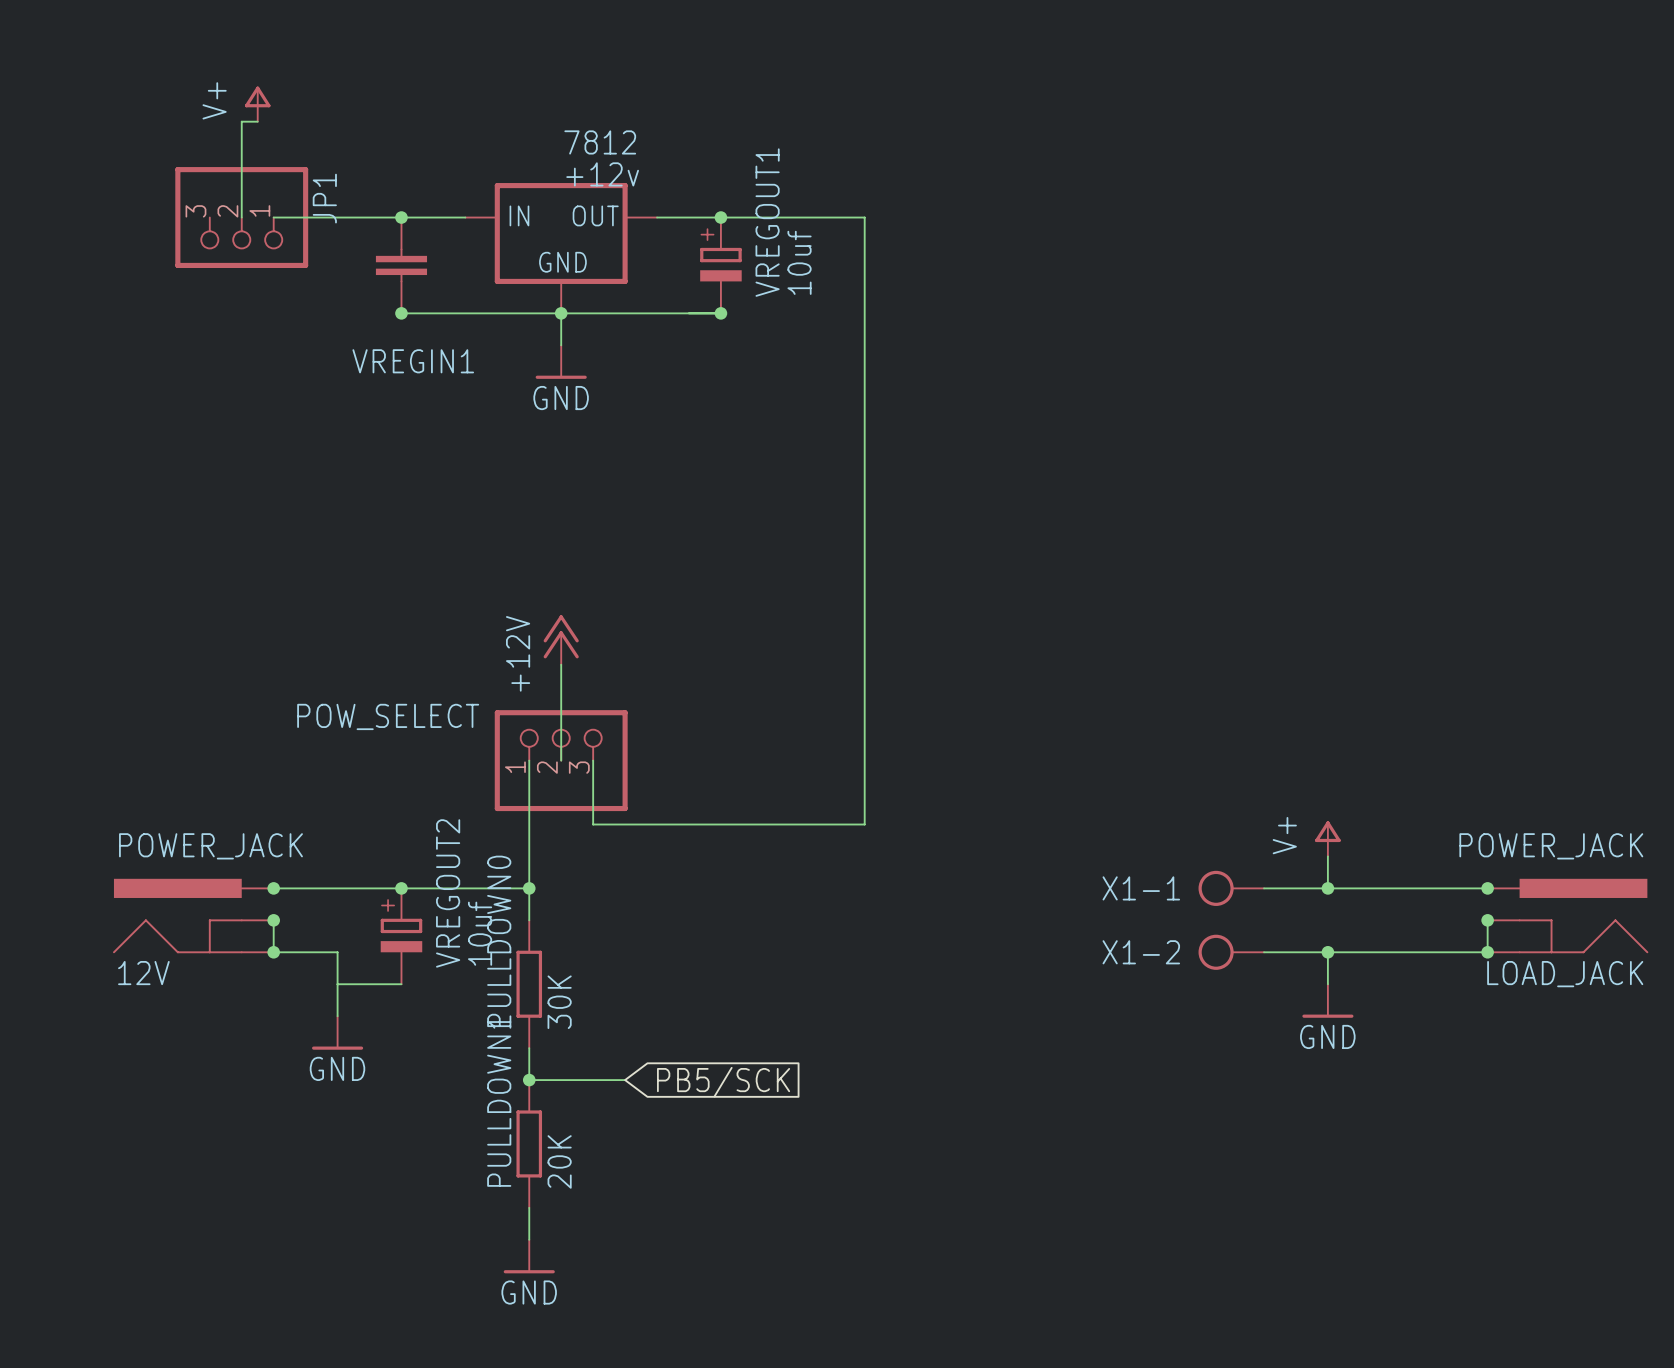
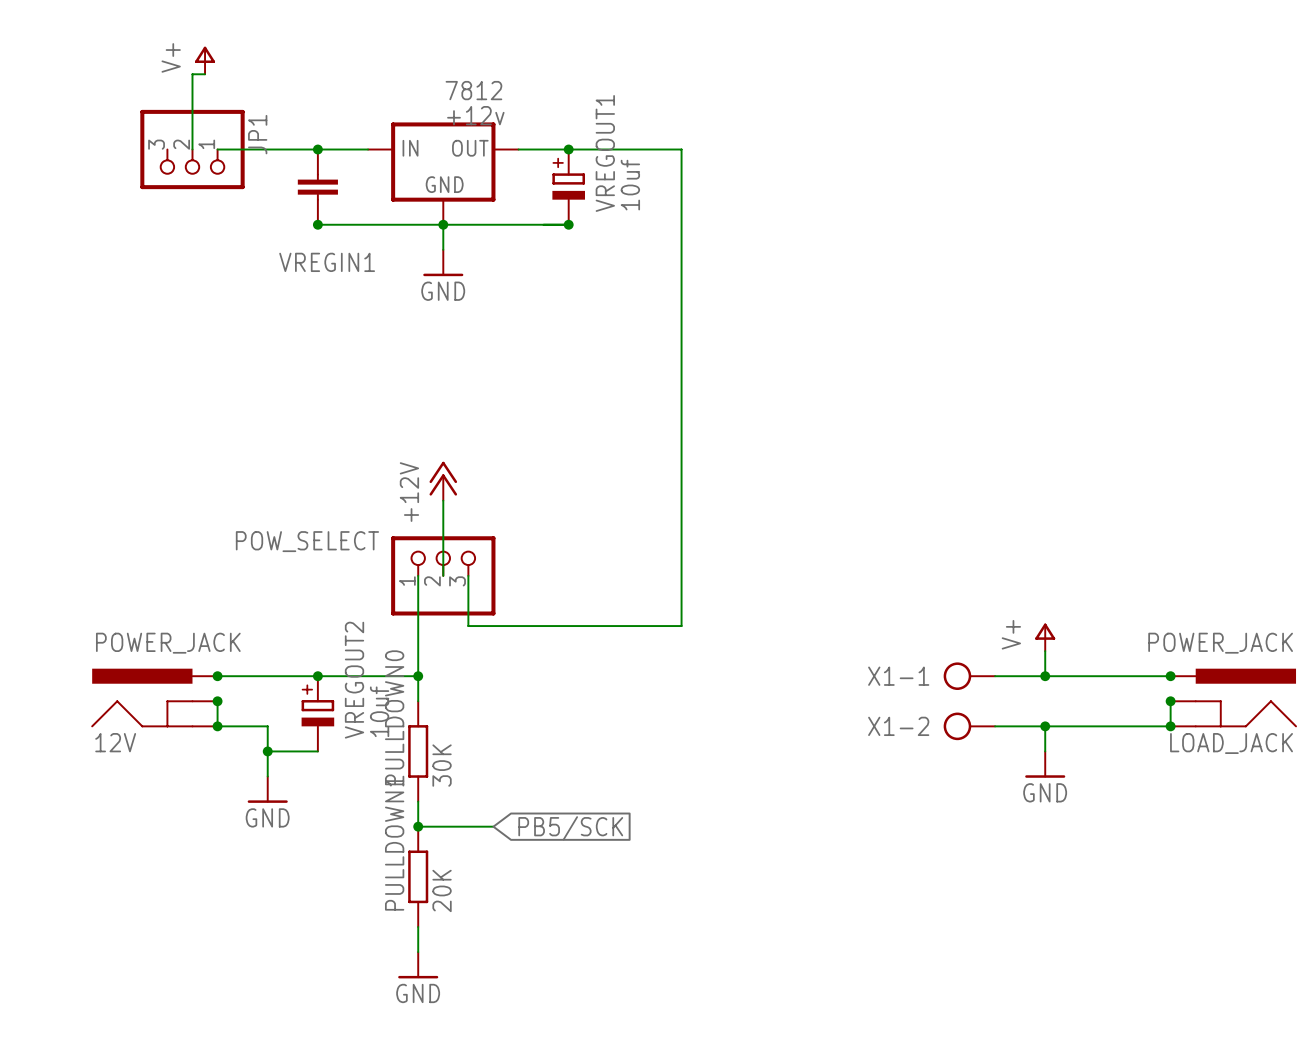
junction: none -> (267, 751)

